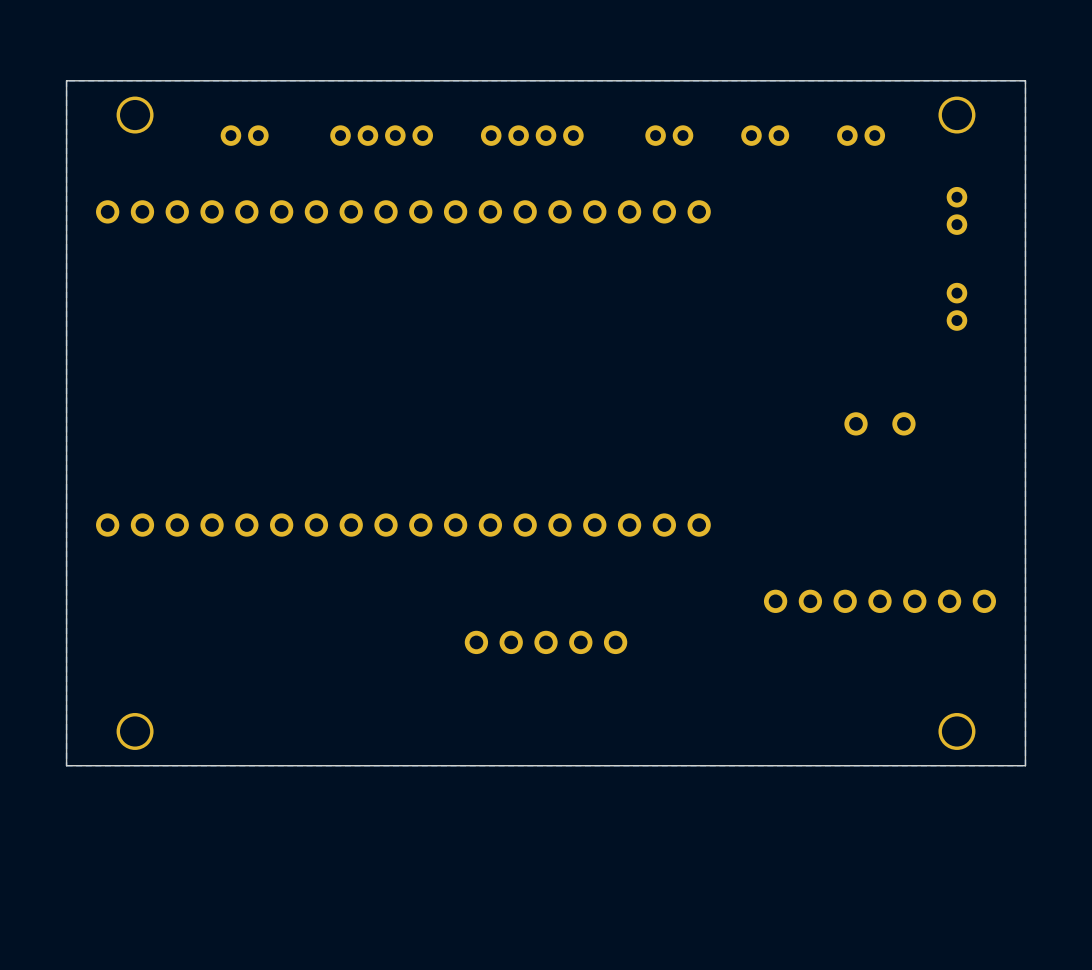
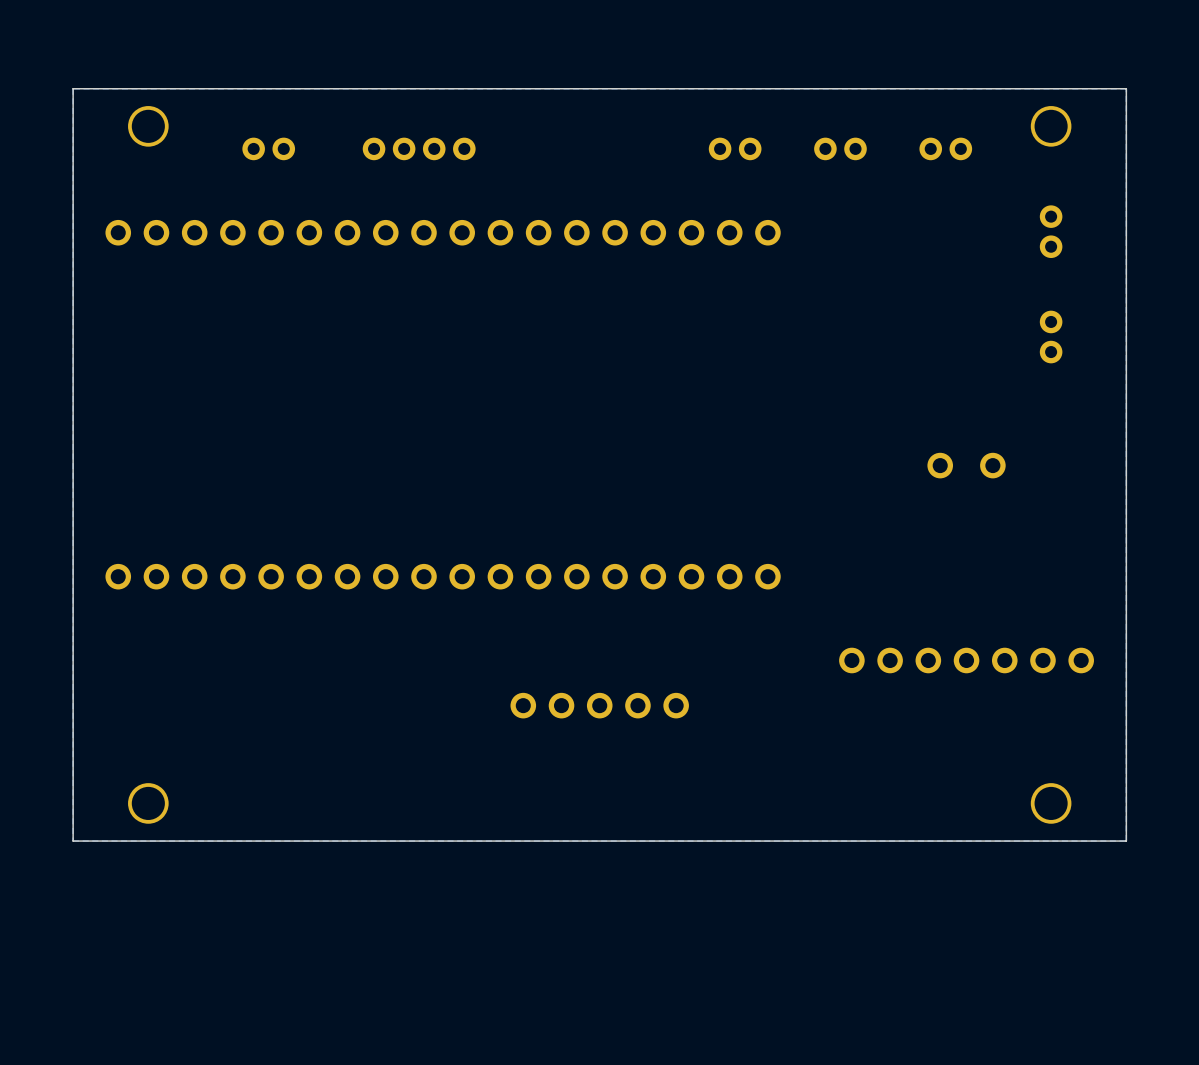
part: (532, 135) -> none

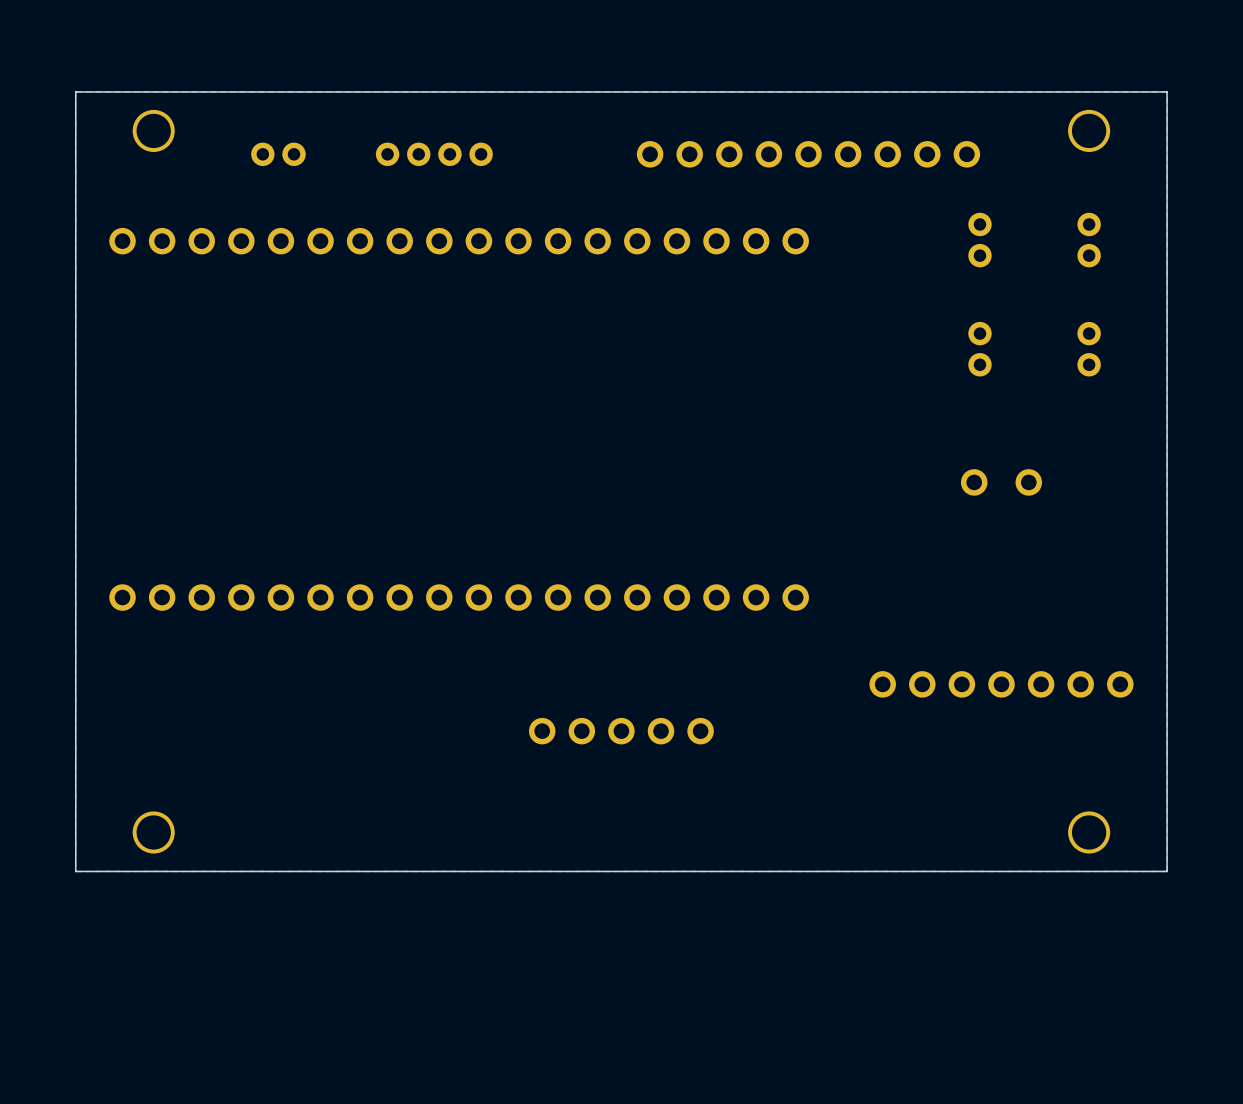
part: (735, 148) -> none
part: none -> (808, 154)
part: (840, 148) -> none
part: (945, 148) -> none
part: none -> (979, 240)
part: none -> (979, 349)

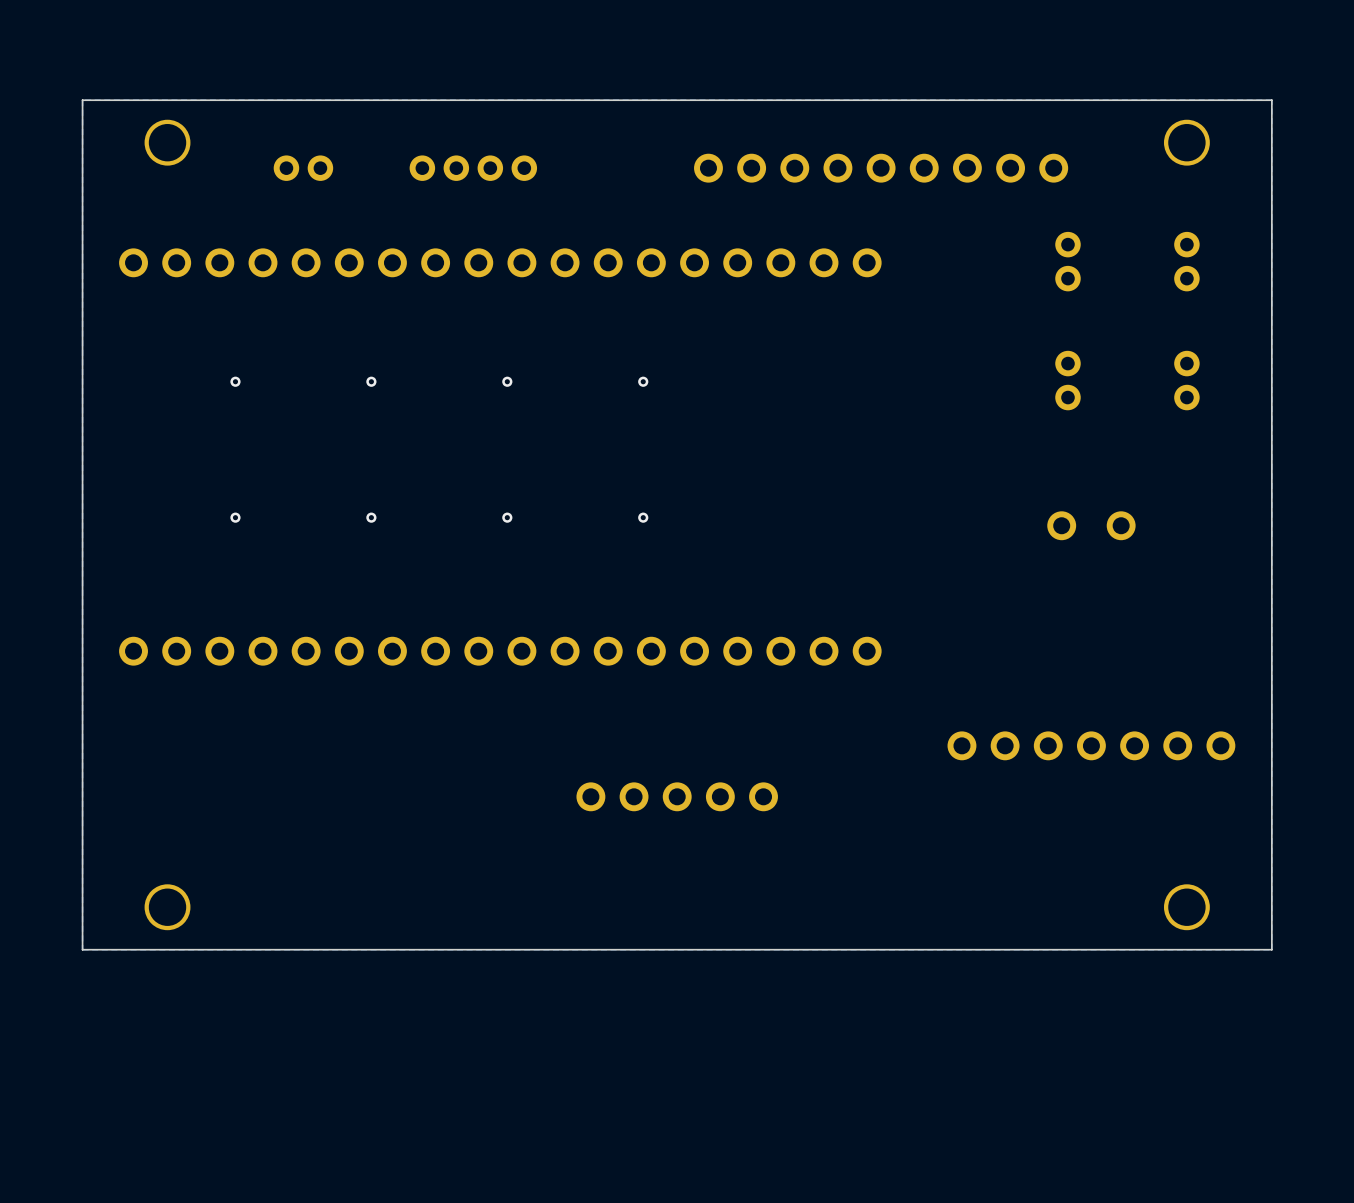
via: none -> (235, 381)
via: none -> (371, 381)
via: none -> (507, 381)
via: none -> (643, 381)
via: none -> (235, 517)
via: none -> (371, 517)
via: none -> (507, 517)
via: none -> (643, 517)

